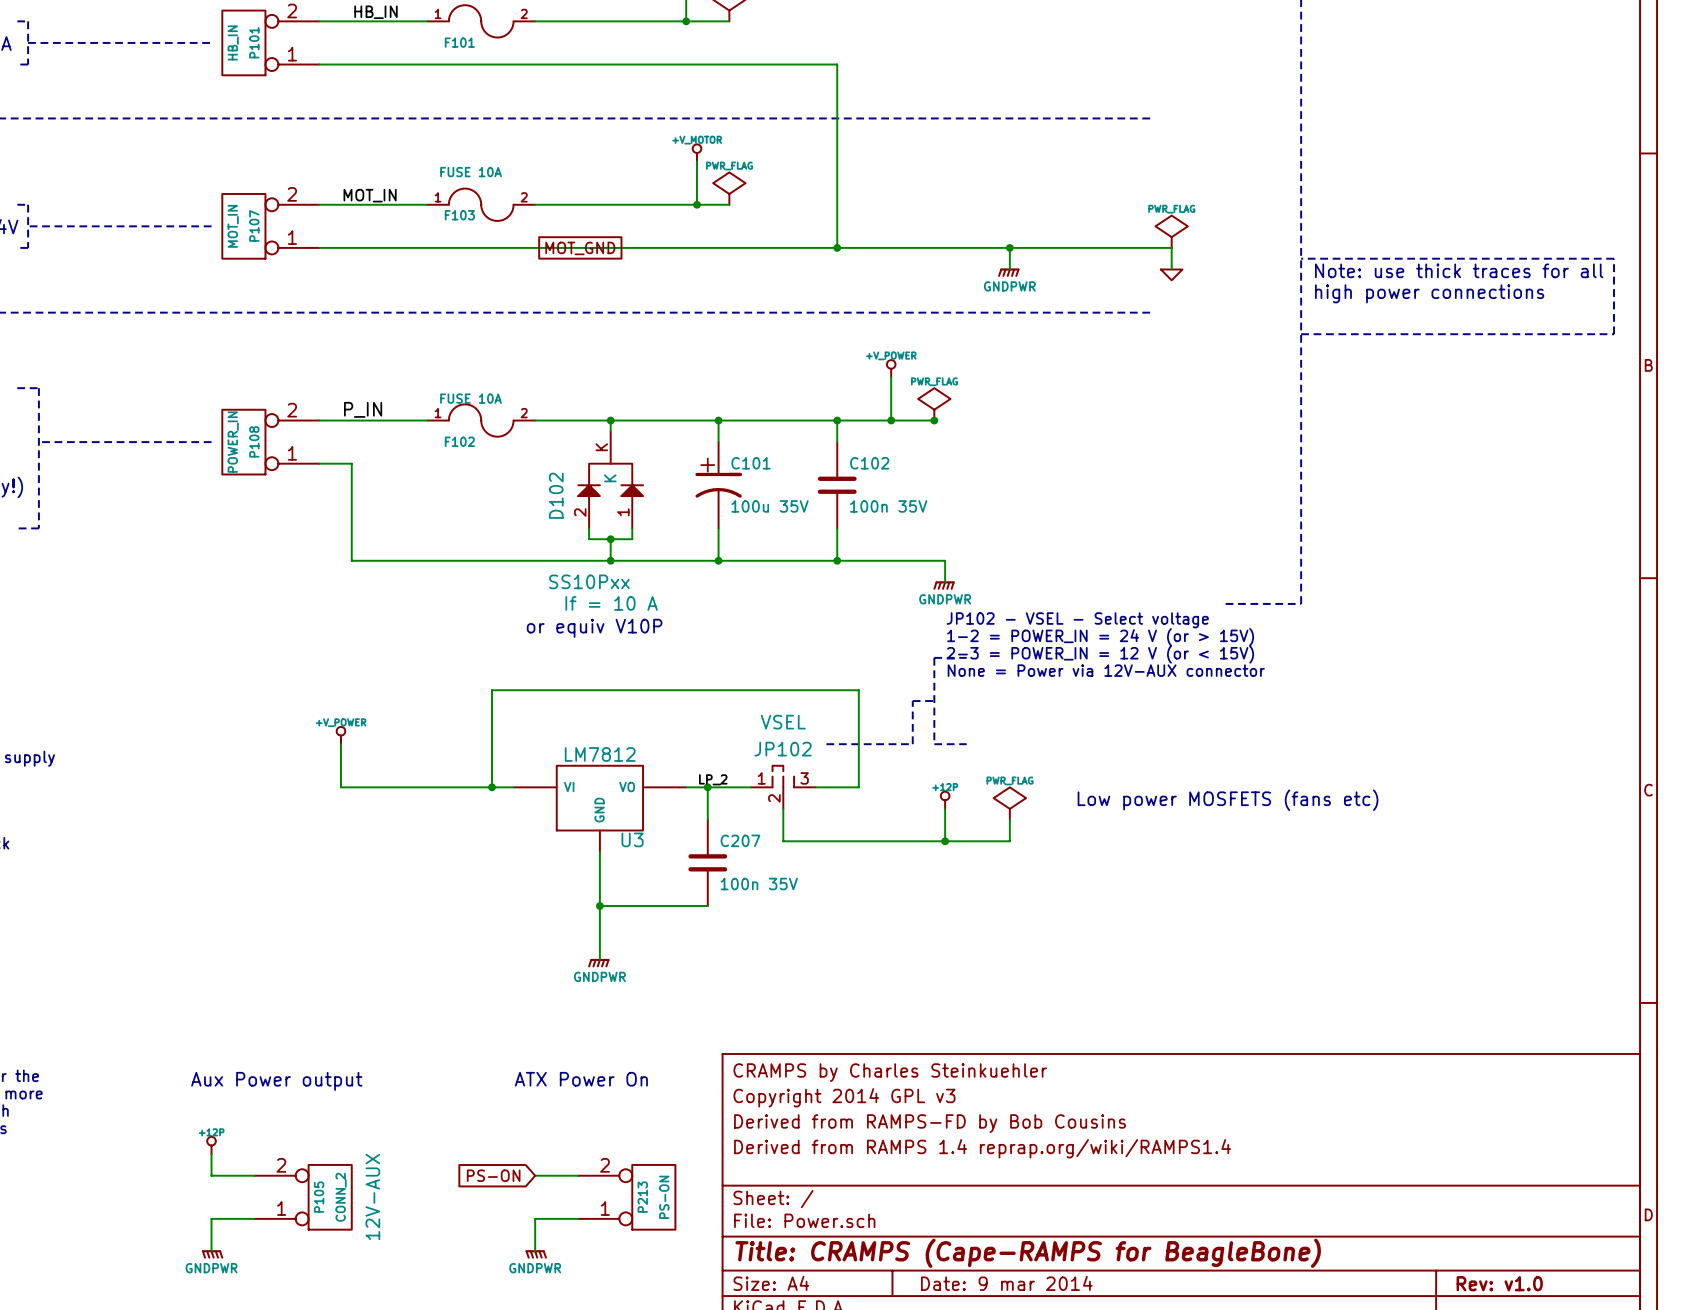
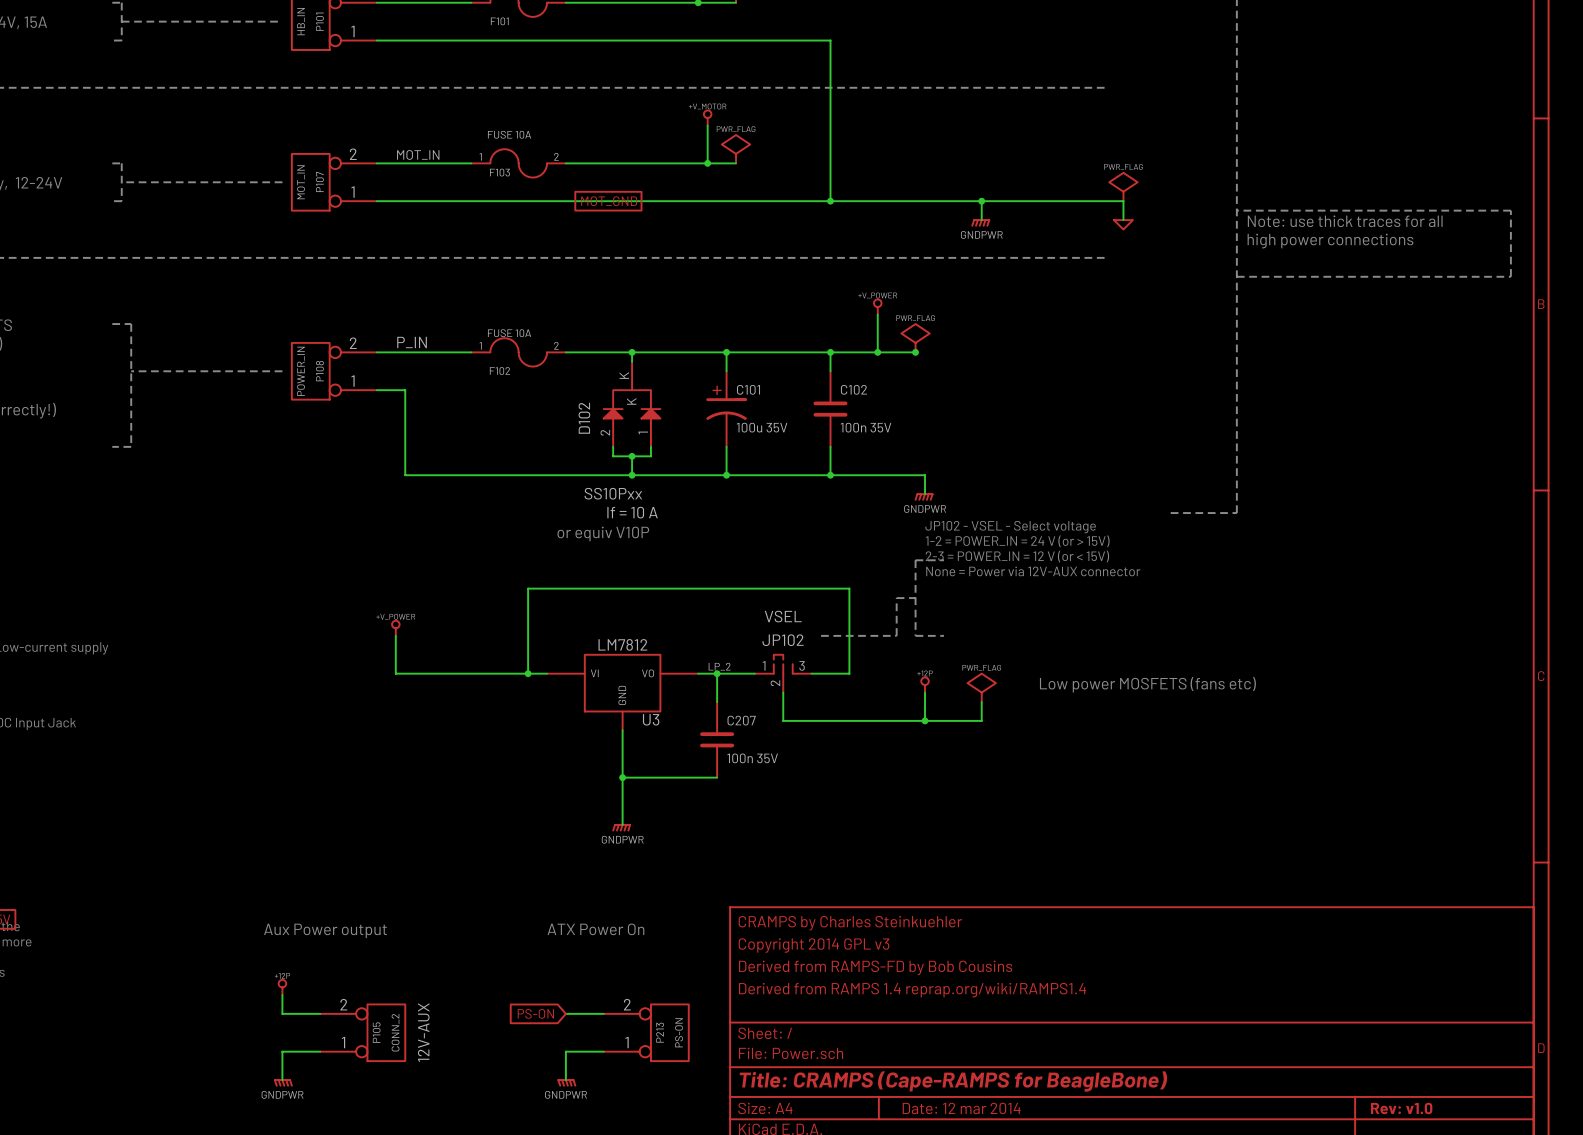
title block: Date: 9 mar 2014 (1006, 1283) -> Date: 12 mar 2014 (961, 1108)

